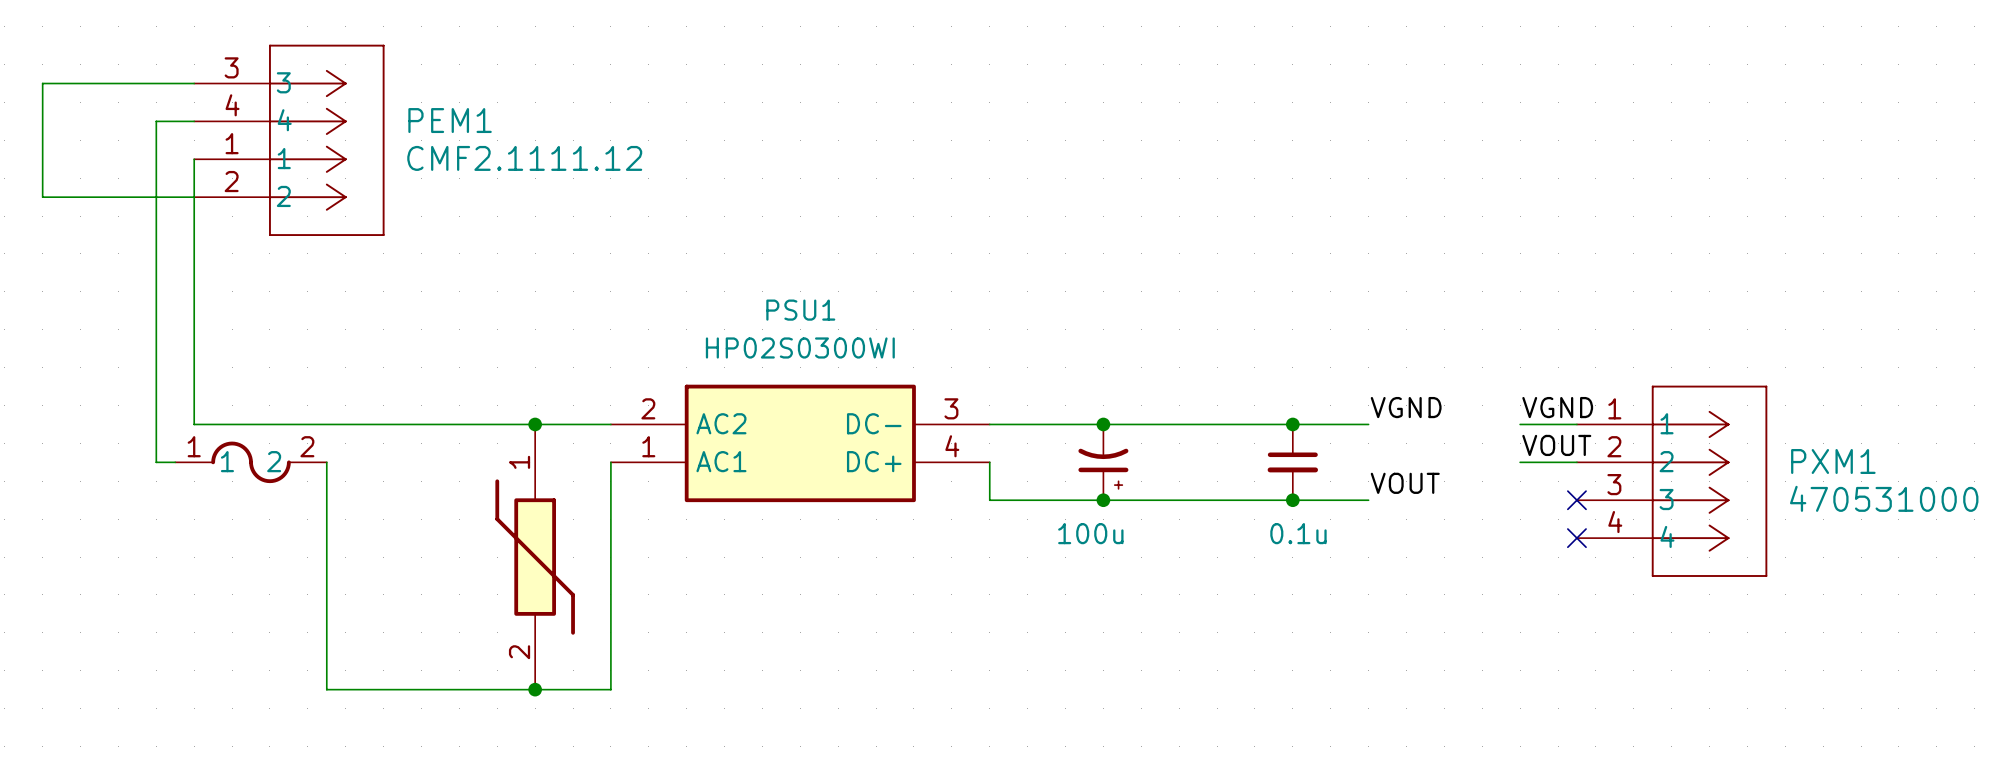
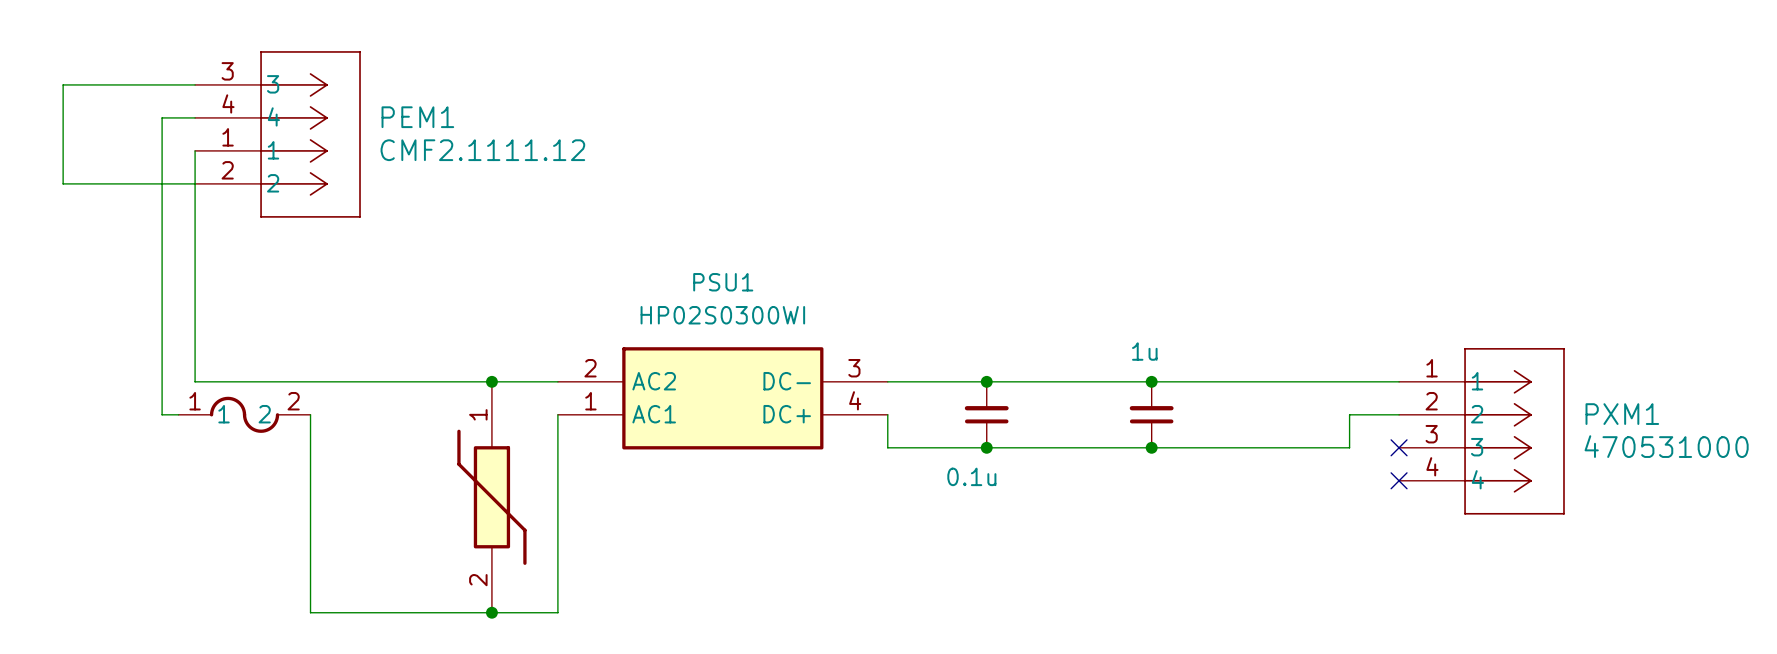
label: VGND (1406, 407) -> none
label: VGND (1557, 407) -> none
part symbol: [1078, 424, 1129, 501] -> [964, 381, 1009, 448]
wire: none -> (1217, 381) (1349, 381)
label: VOUT (1556, 445) -> none
part rotation: 0° (1292, 462) -> 180° (1151, 414)
wire: none -> (1349, 414) (1349, 447) (1217, 447)
label: VOUT (1405, 483) -> none
part value: 100u (1090, 533) -> 0.1u (971, 476)
part value: 0.1u (1298, 533) -> 1u (1144, 351)

